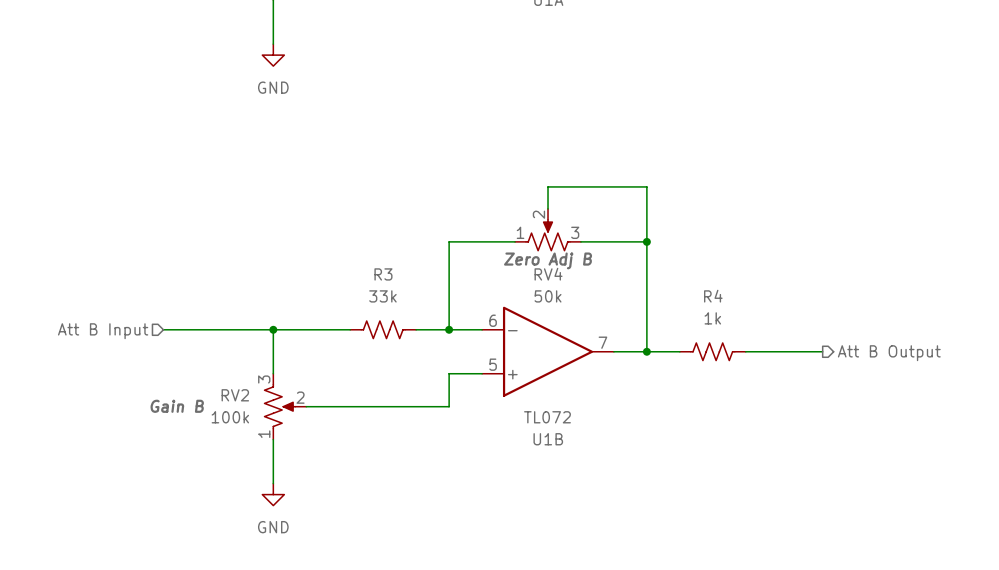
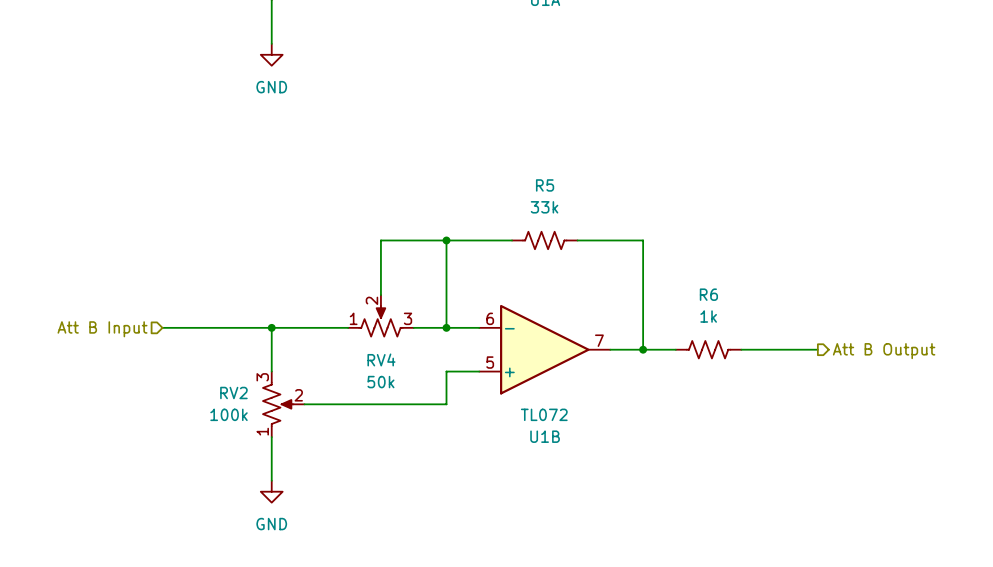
wire: (548, 208) (548, 186) (646, 186) (646, 241) -> none
RV4 position: (548, 229) -> (380, 315)
wire: none -> (446, 240) (380, 240) (380, 295)
junction: none -> (446, 240)
R5: none -> 33k (544, 240)
junction: (646, 241) -> none
RV4 text: Zero Adj B (548, 260) -> none
R4 name: R4 (713, 296) -> R6 (708, 294)
R3: 33k (383, 329) -> none
RV2 text: Gain B (177, 406) -> none

